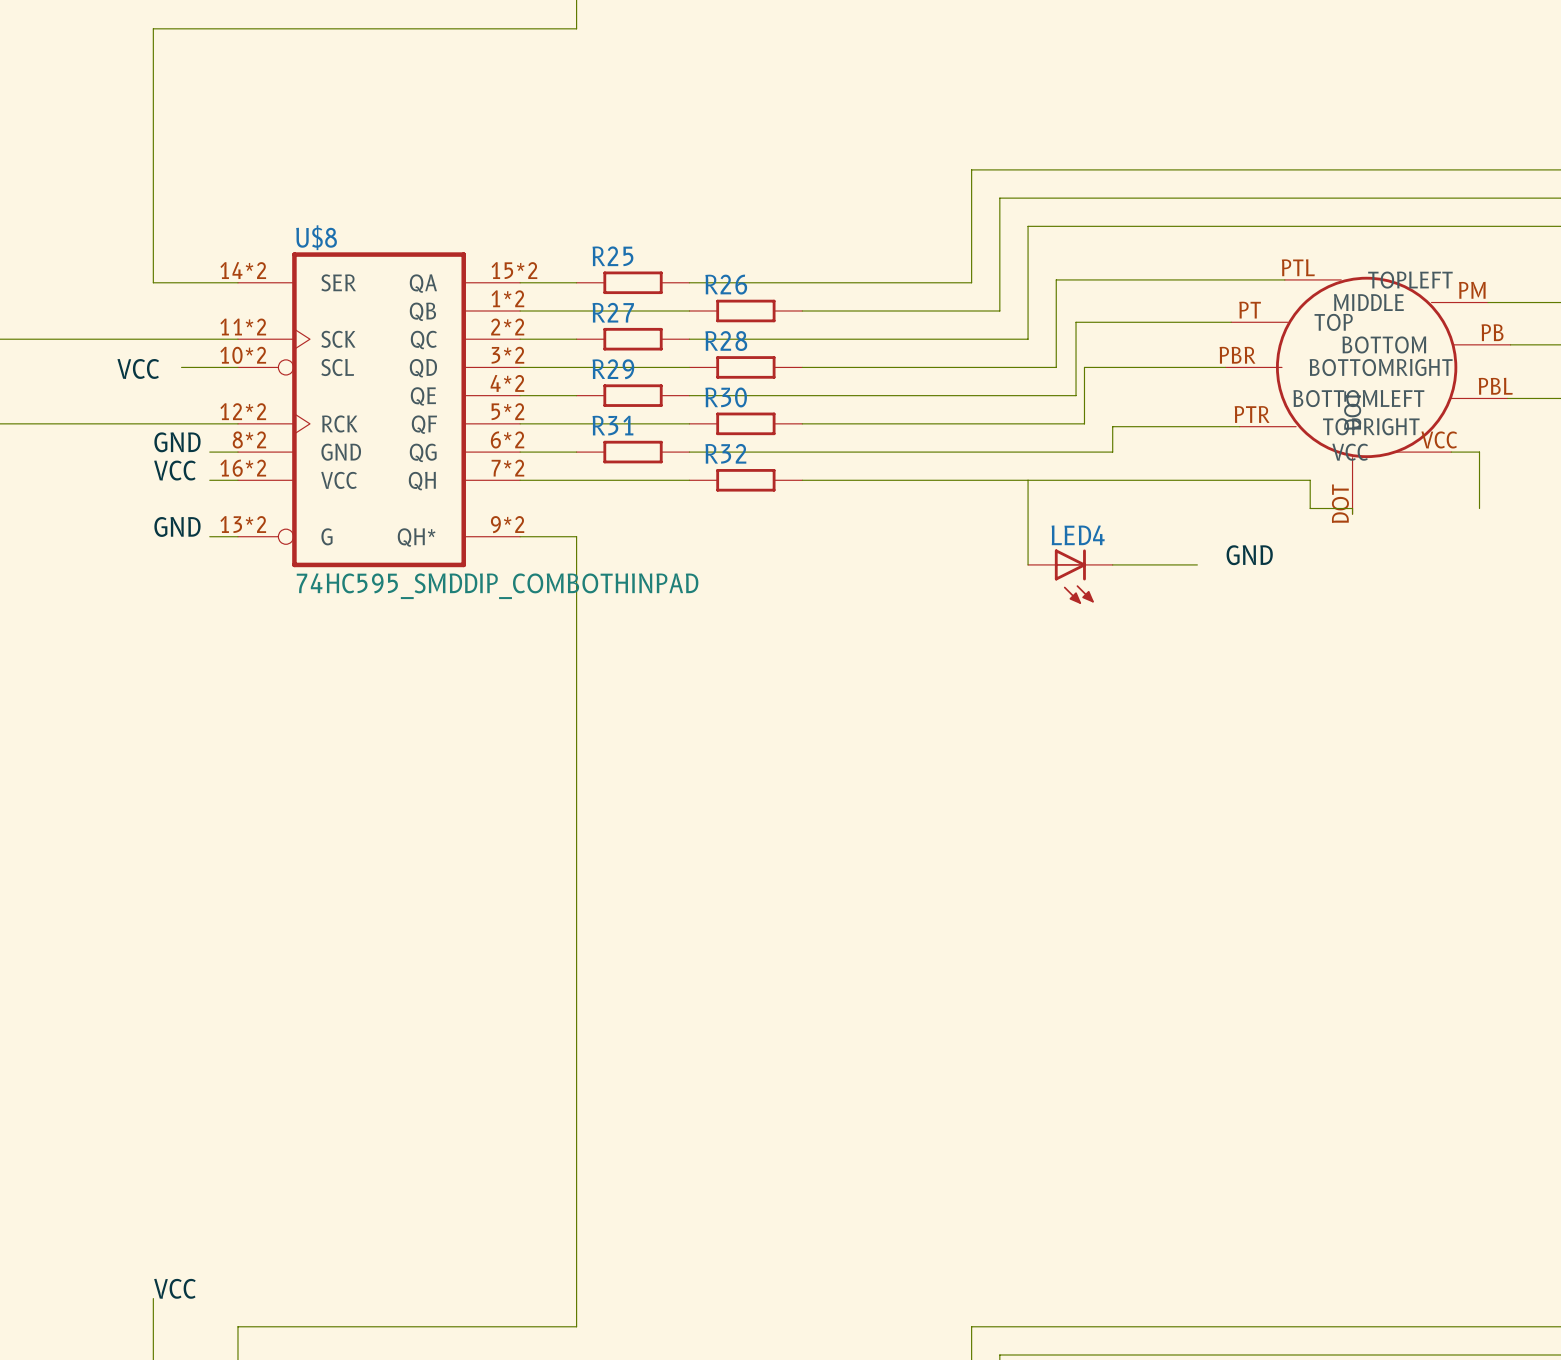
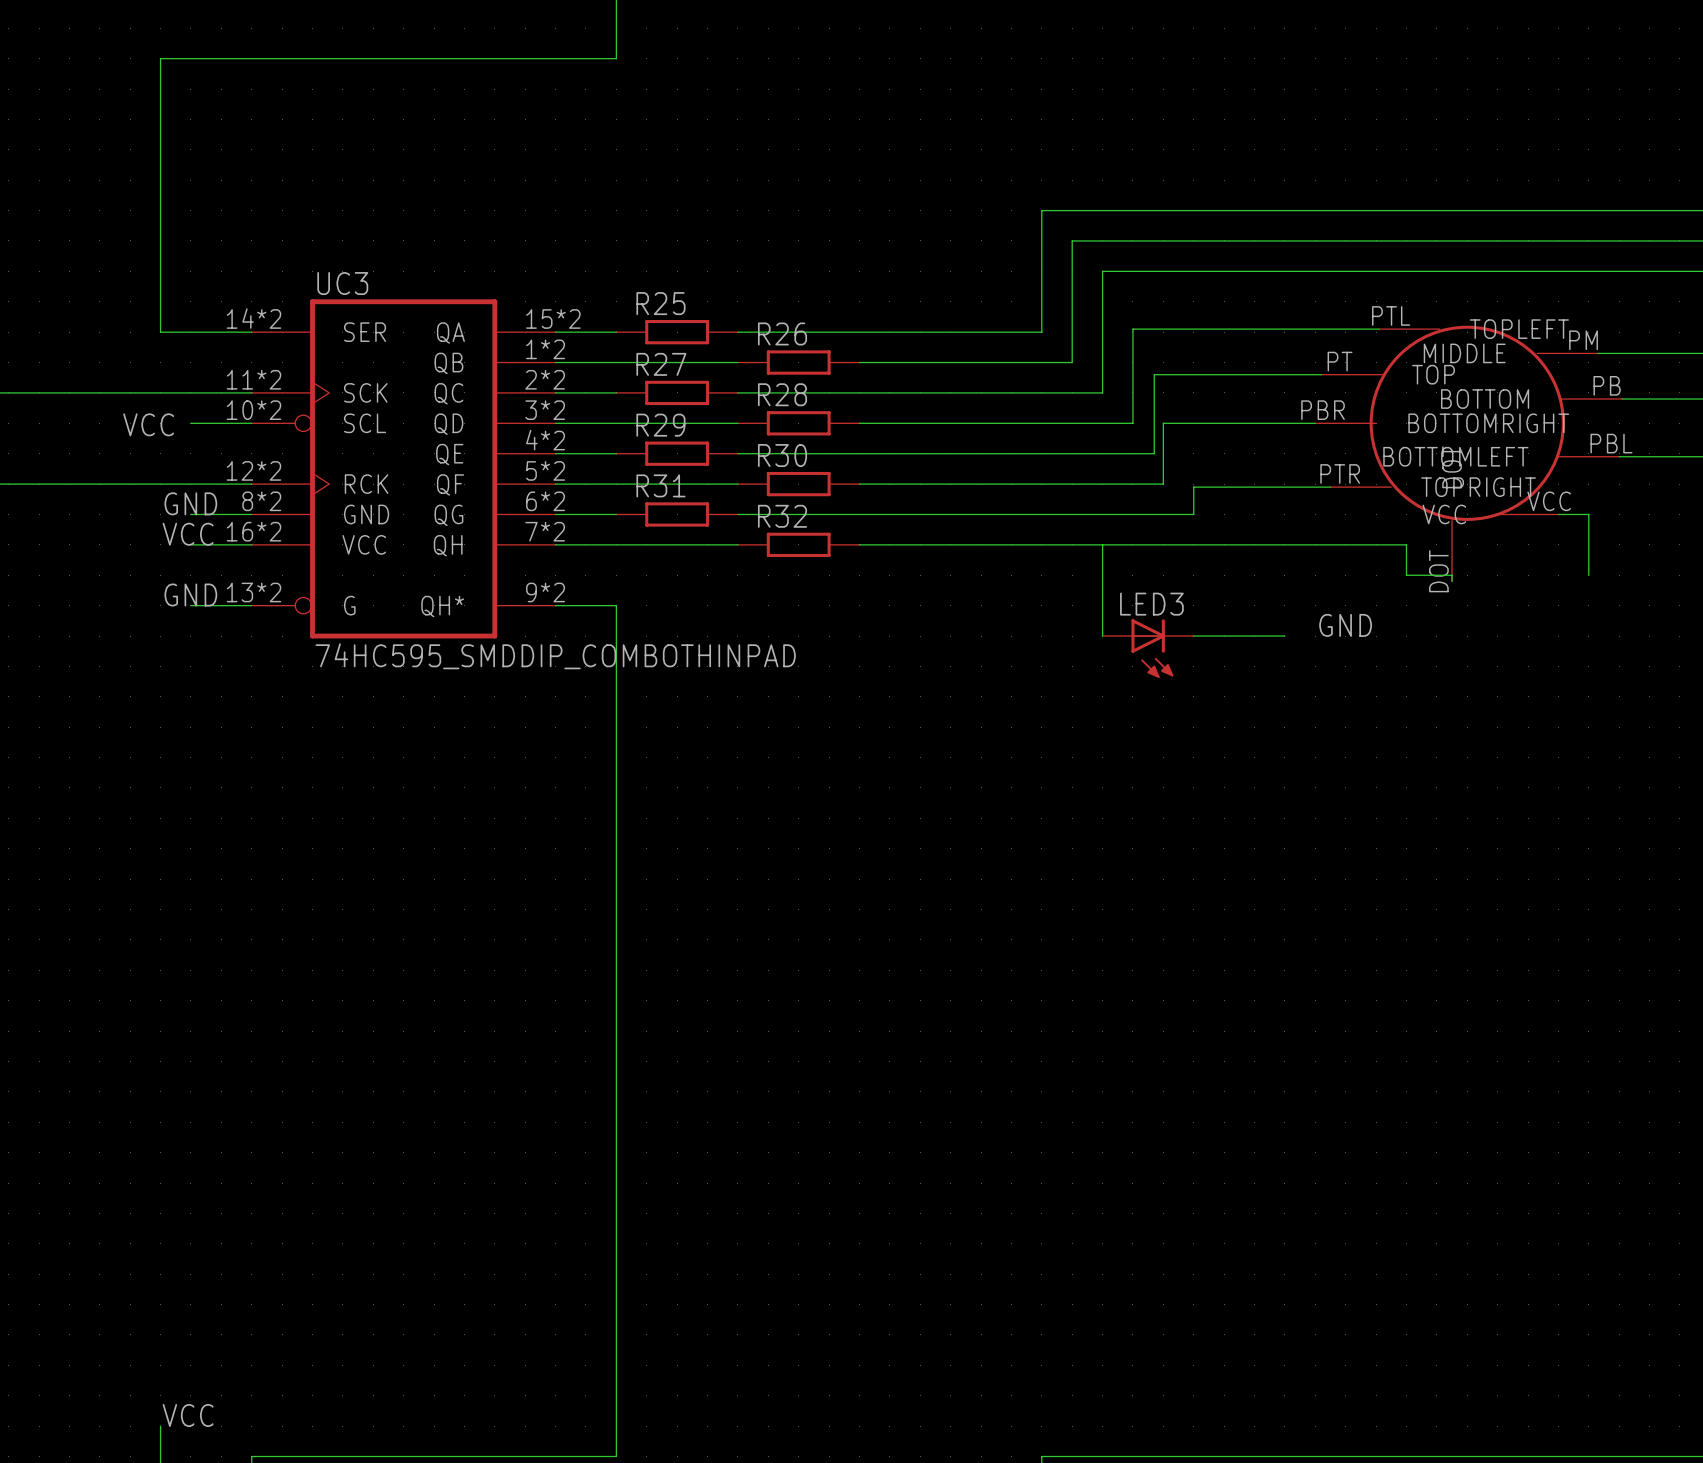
U$8 name: U$8 (316, 237) -> UC3 (342, 283)
wire: none -> (190, 514) (221, 514)
wire: none -> (190, 544) (221, 544)
LED4 name: LED4 (1078, 535) -> LED3 (1151, 604)
wire: none -> (190, 605) (221, 605)

